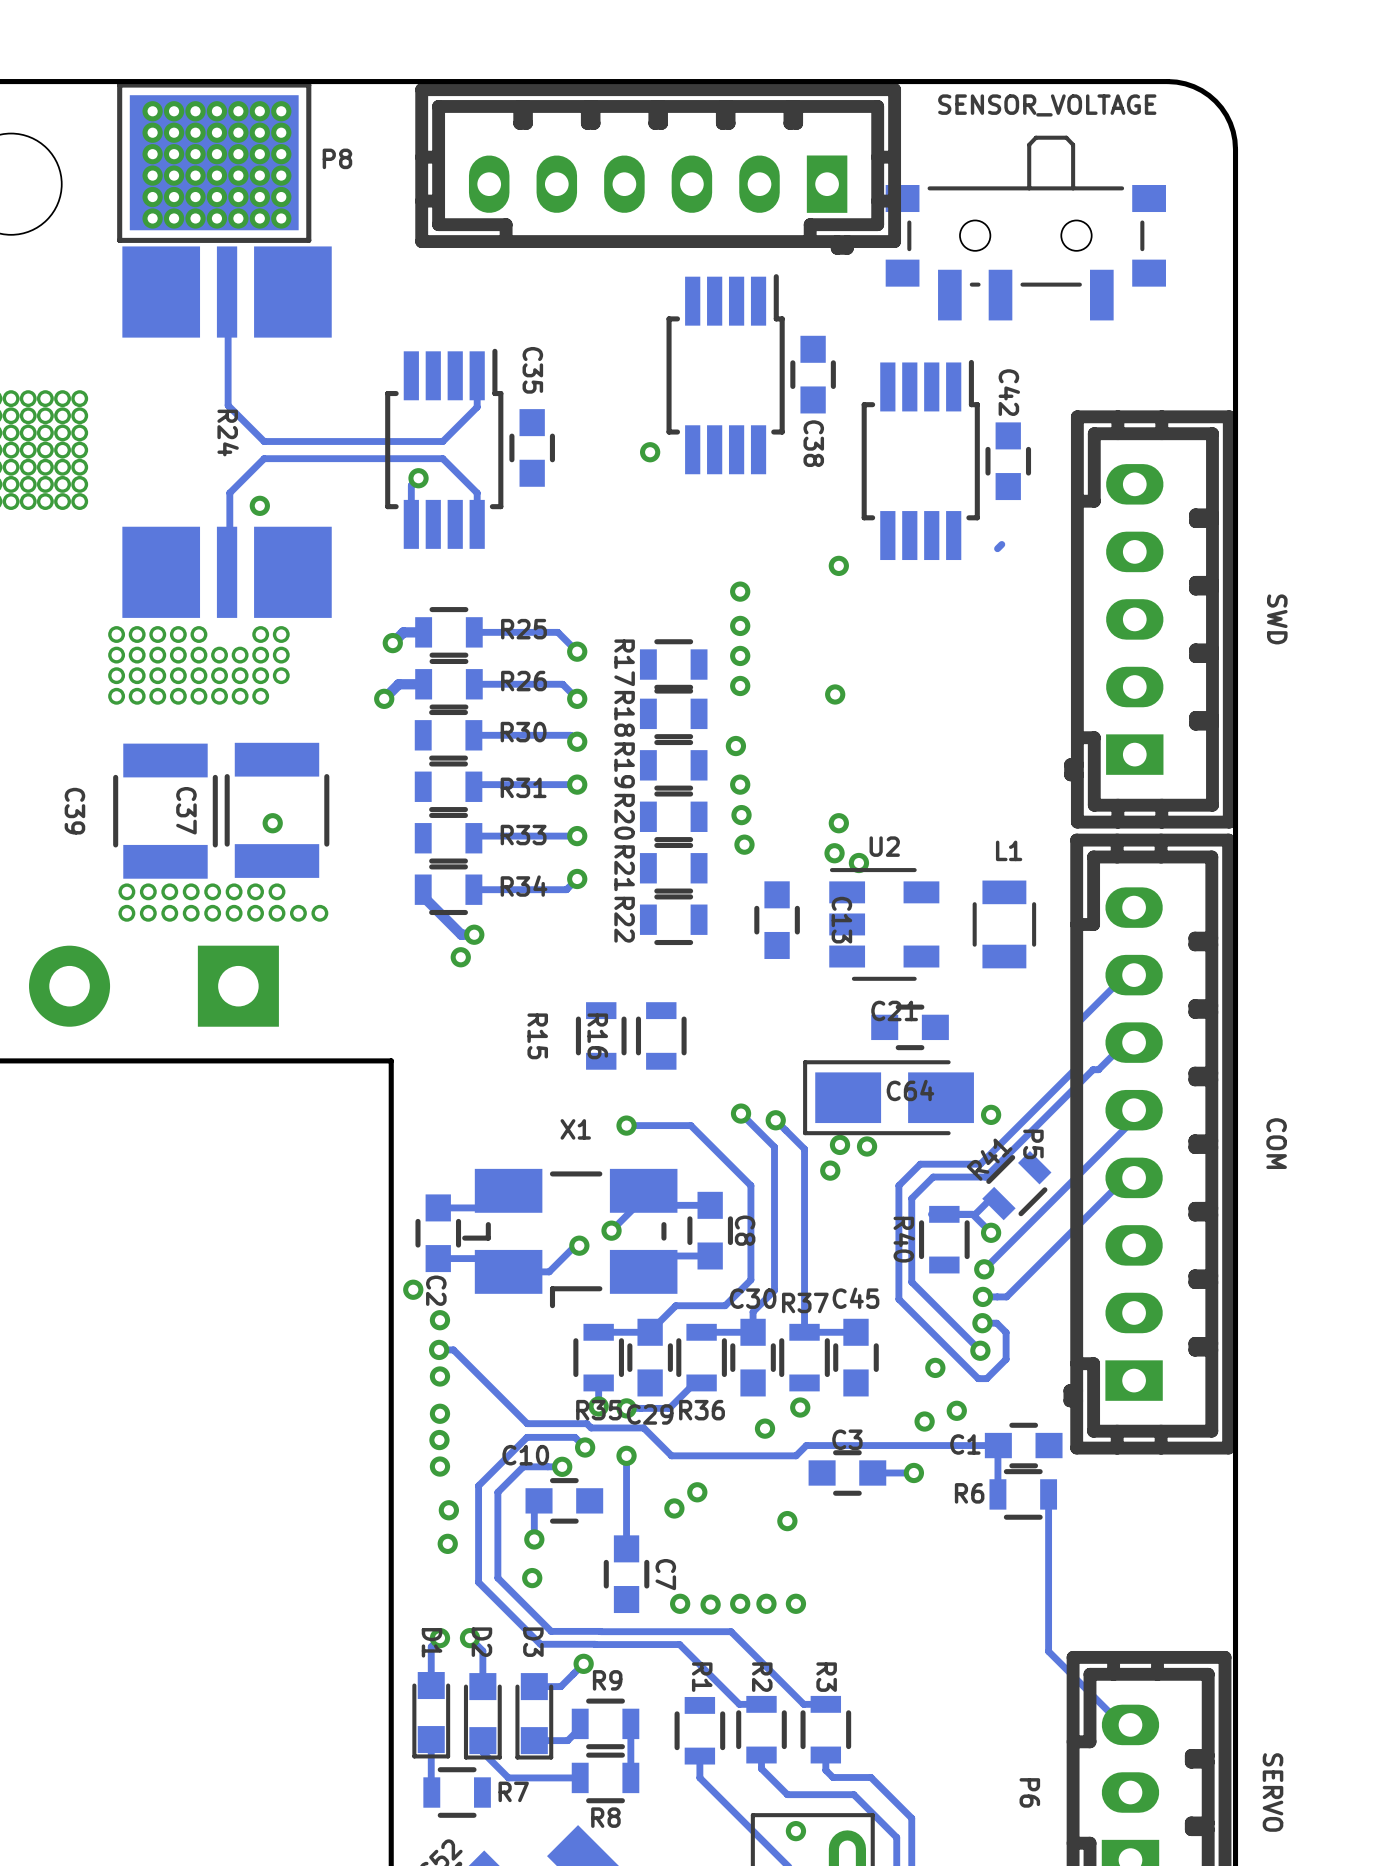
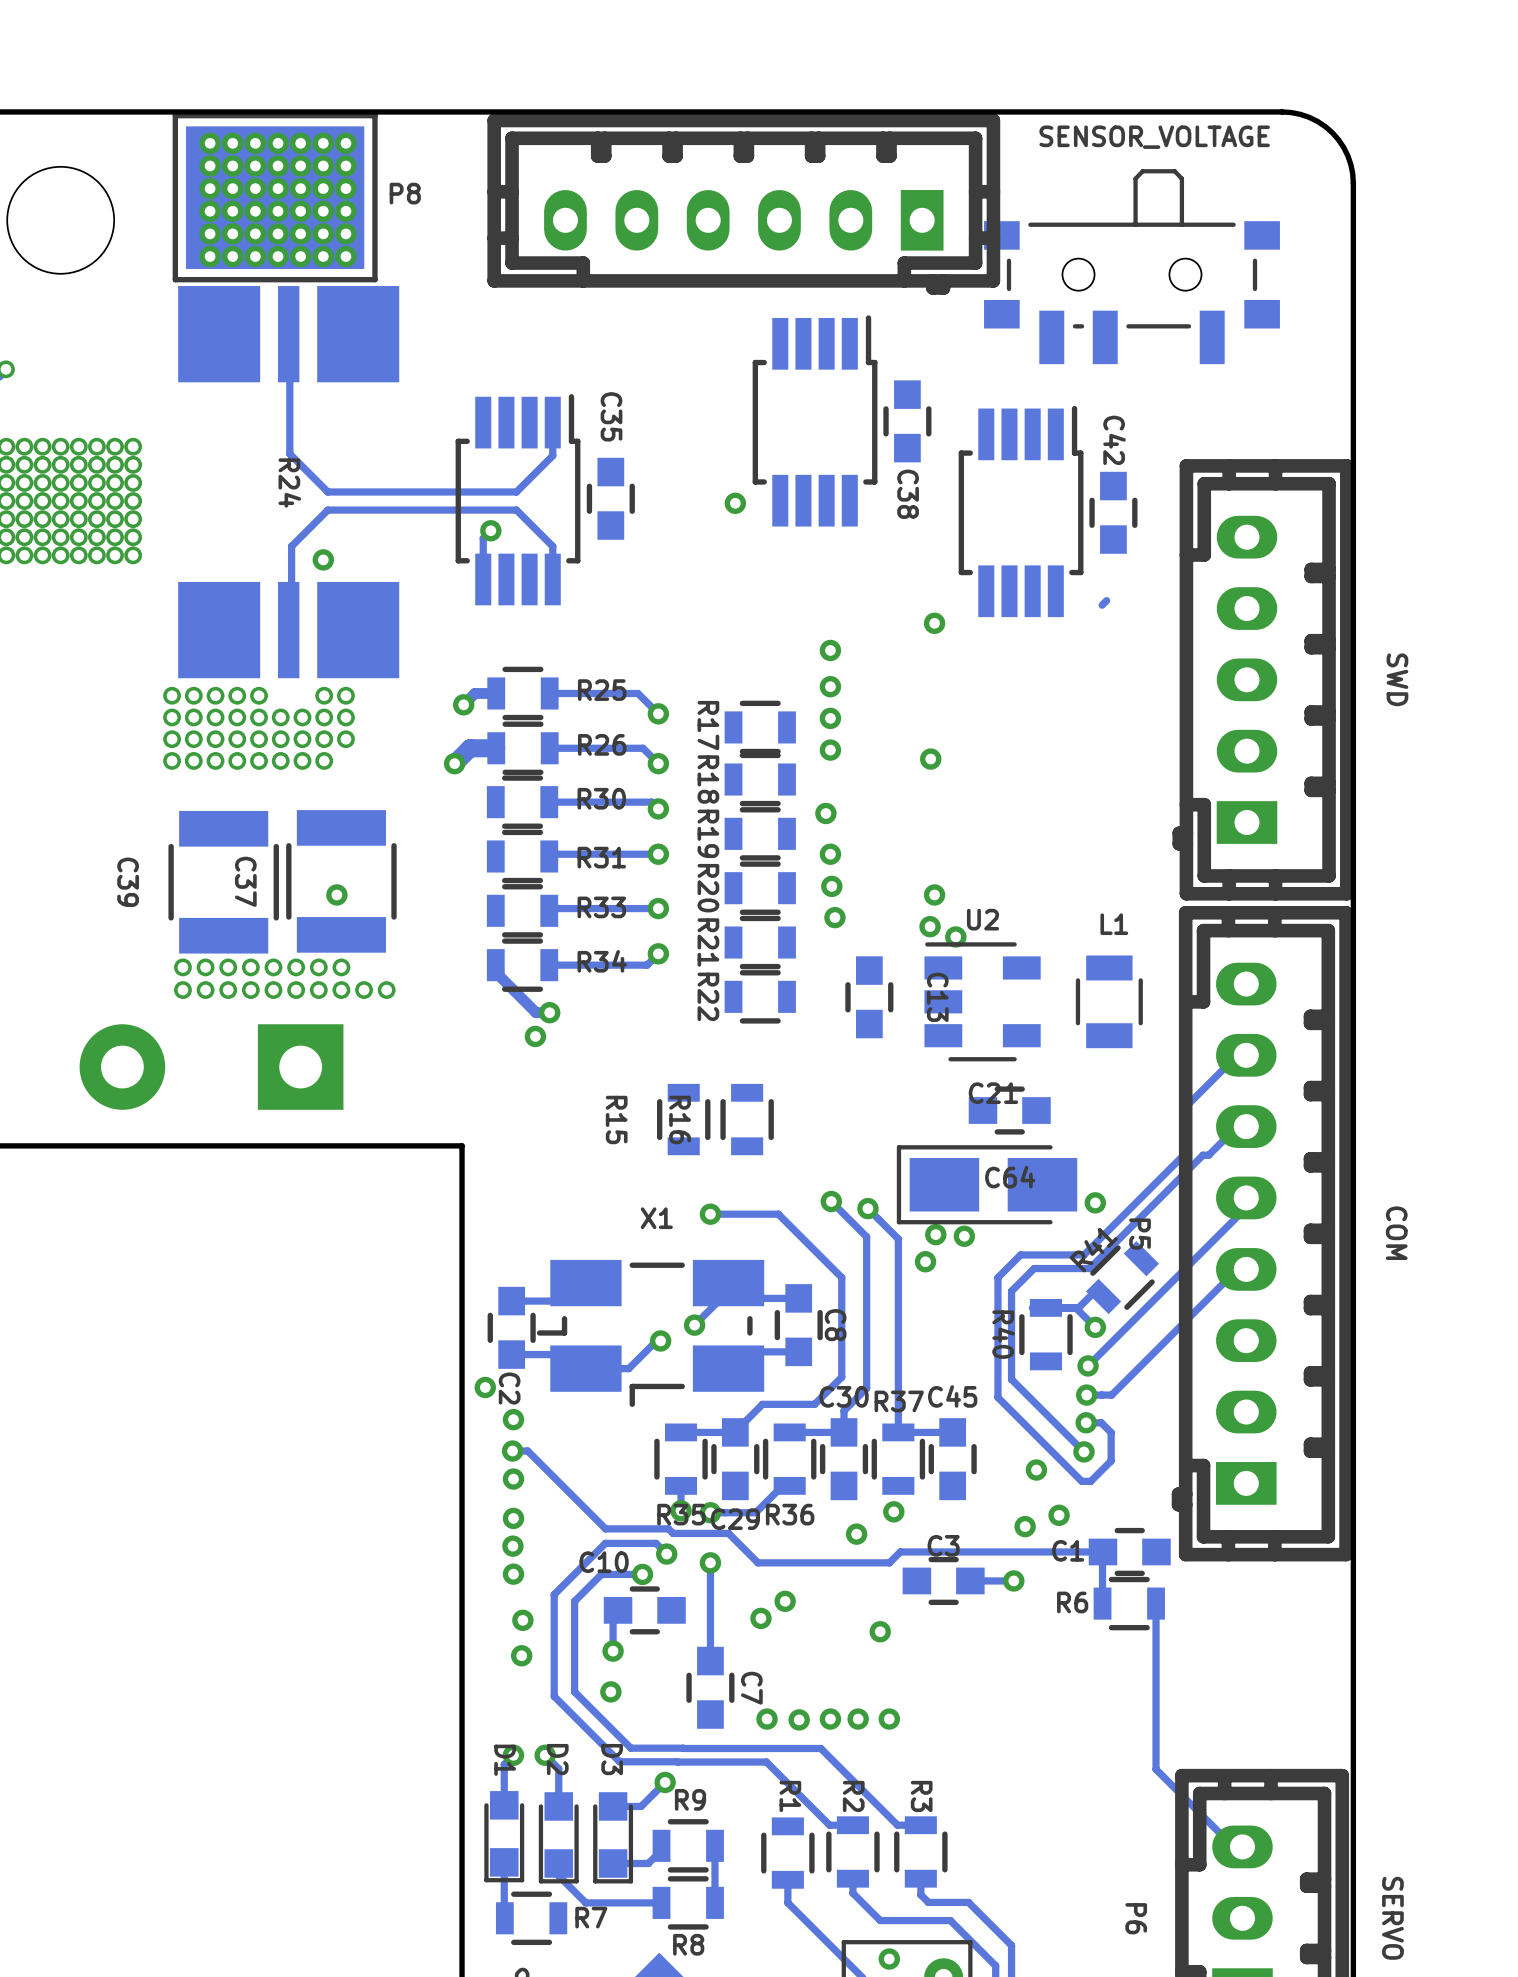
track width: thin (423, 684) (398, 684) (384, 698) -> thick (496, 748) (470, 748) (454, 763)

